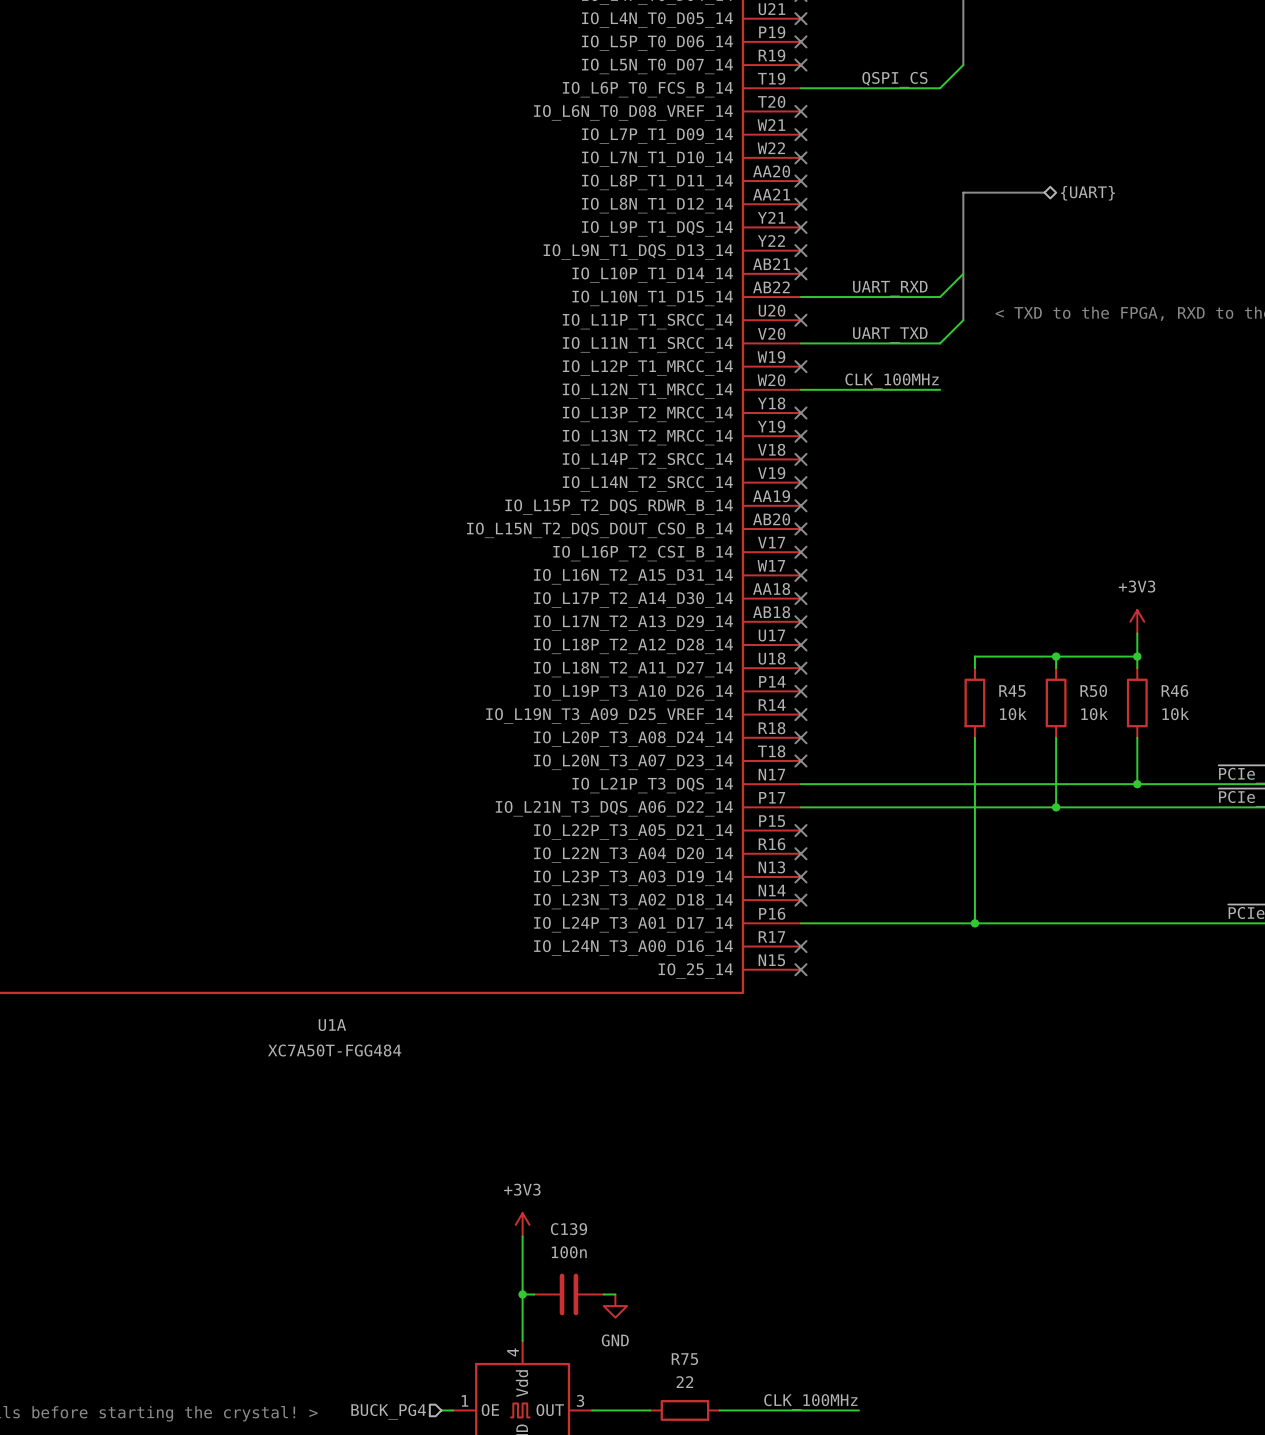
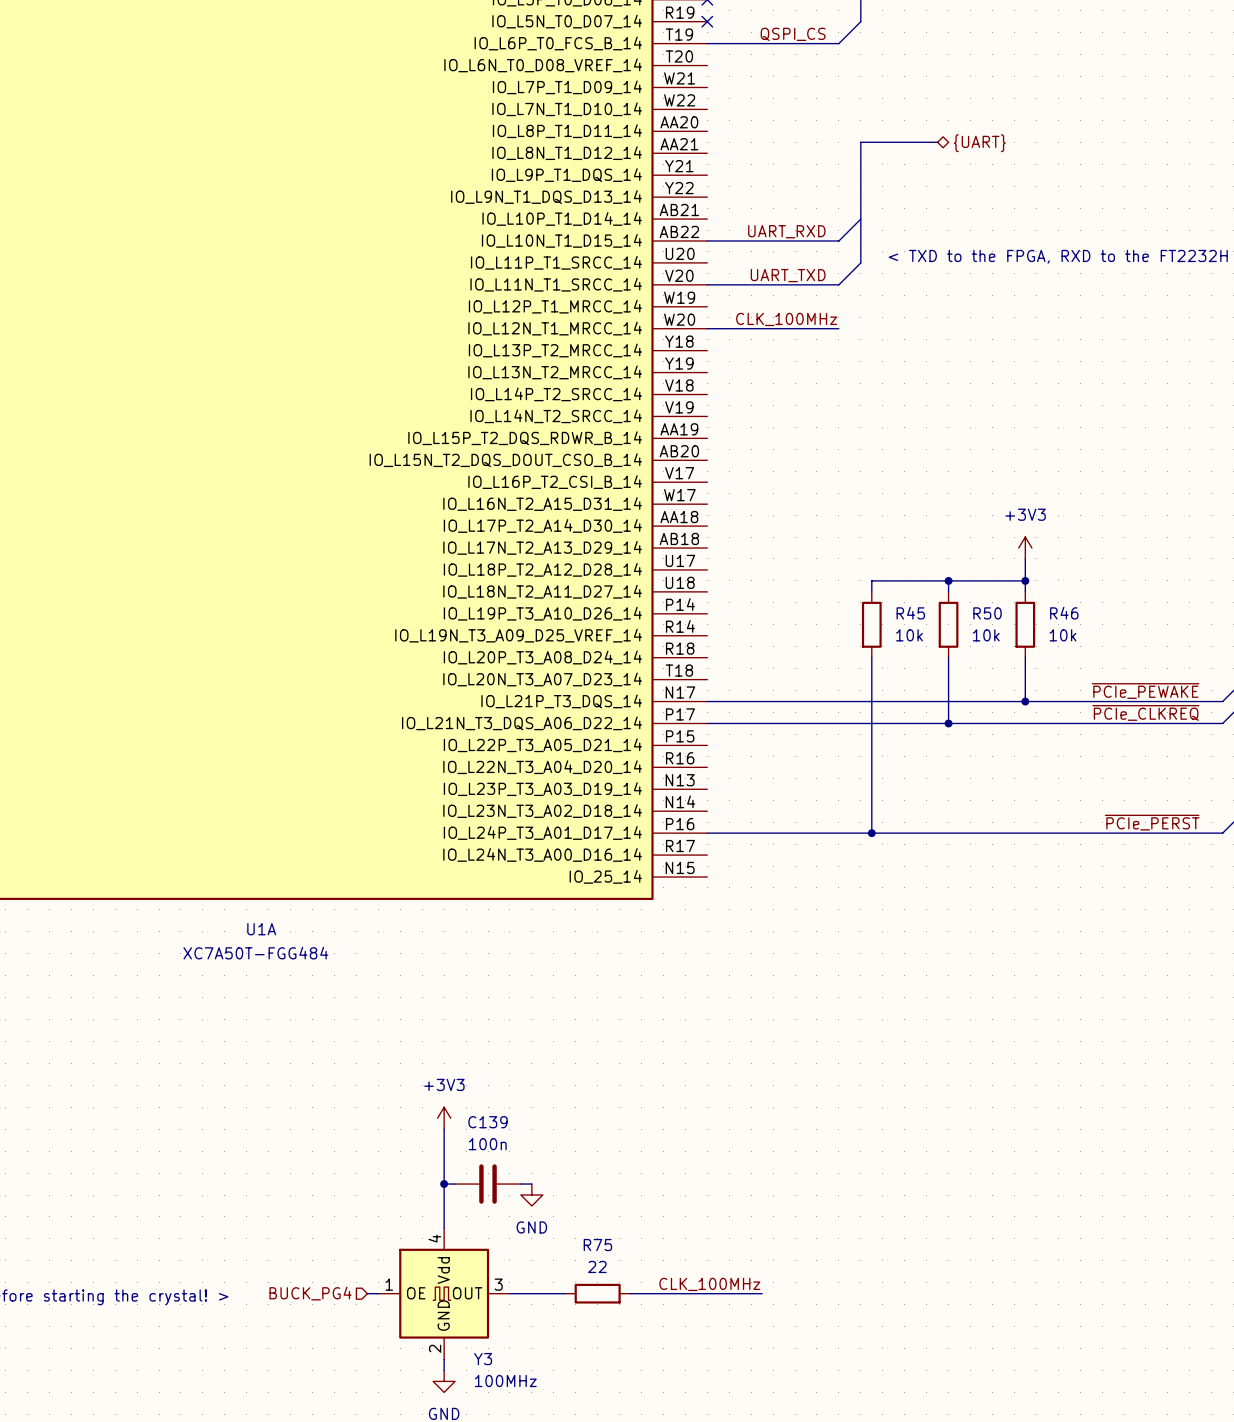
no-connect mark: (800, 111) -> none
no-connect mark: (800, 134) -> none
no-connect mark: (800, 157) -> none
no-connect mark: (800, 181) -> none
no-connect mark: (800, 204) -> none
no-connect mark: (800, 227) -> none
no-connect mark: (800, 250) -> none
no-connect mark: (800, 273) -> none
no-connect mark: (800, 320) -> none
no-connect mark: (800, 366) -> none
no-connect mark: (800, 413) -> none
no-connect mark: (800, 436) -> none
no-connect mark: (800, 459) -> none
no-connect mark: (800, 482) -> none
no-connect mark: (800, 505) -> none
no-connect mark: (800, 529) -> none
no-connect mark: (800, 552) -> none
no-connect mark: (800, 575) -> none
no-connect mark: (800, 598) -> none
no-connect mark: (800, 621) -> none
no-connect mark: (800, 644) -> none
no-connect mark: (800, 668) -> none
no-connect mark: (800, 691) -> none
no-connect mark: (800, 714) -> none
no-connect mark: (800, 737) -> none
no-connect mark: (800, 760) -> none
no-connect mark: (800, 830) -> none
no-connect mark: (800, 853) -> none
no-connect mark: (800, 876) -> none
no-connect mark: (800, 900) -> none
no-connect mark: (800, 946) -> none
no-connect mark: (800, 969) -> none

